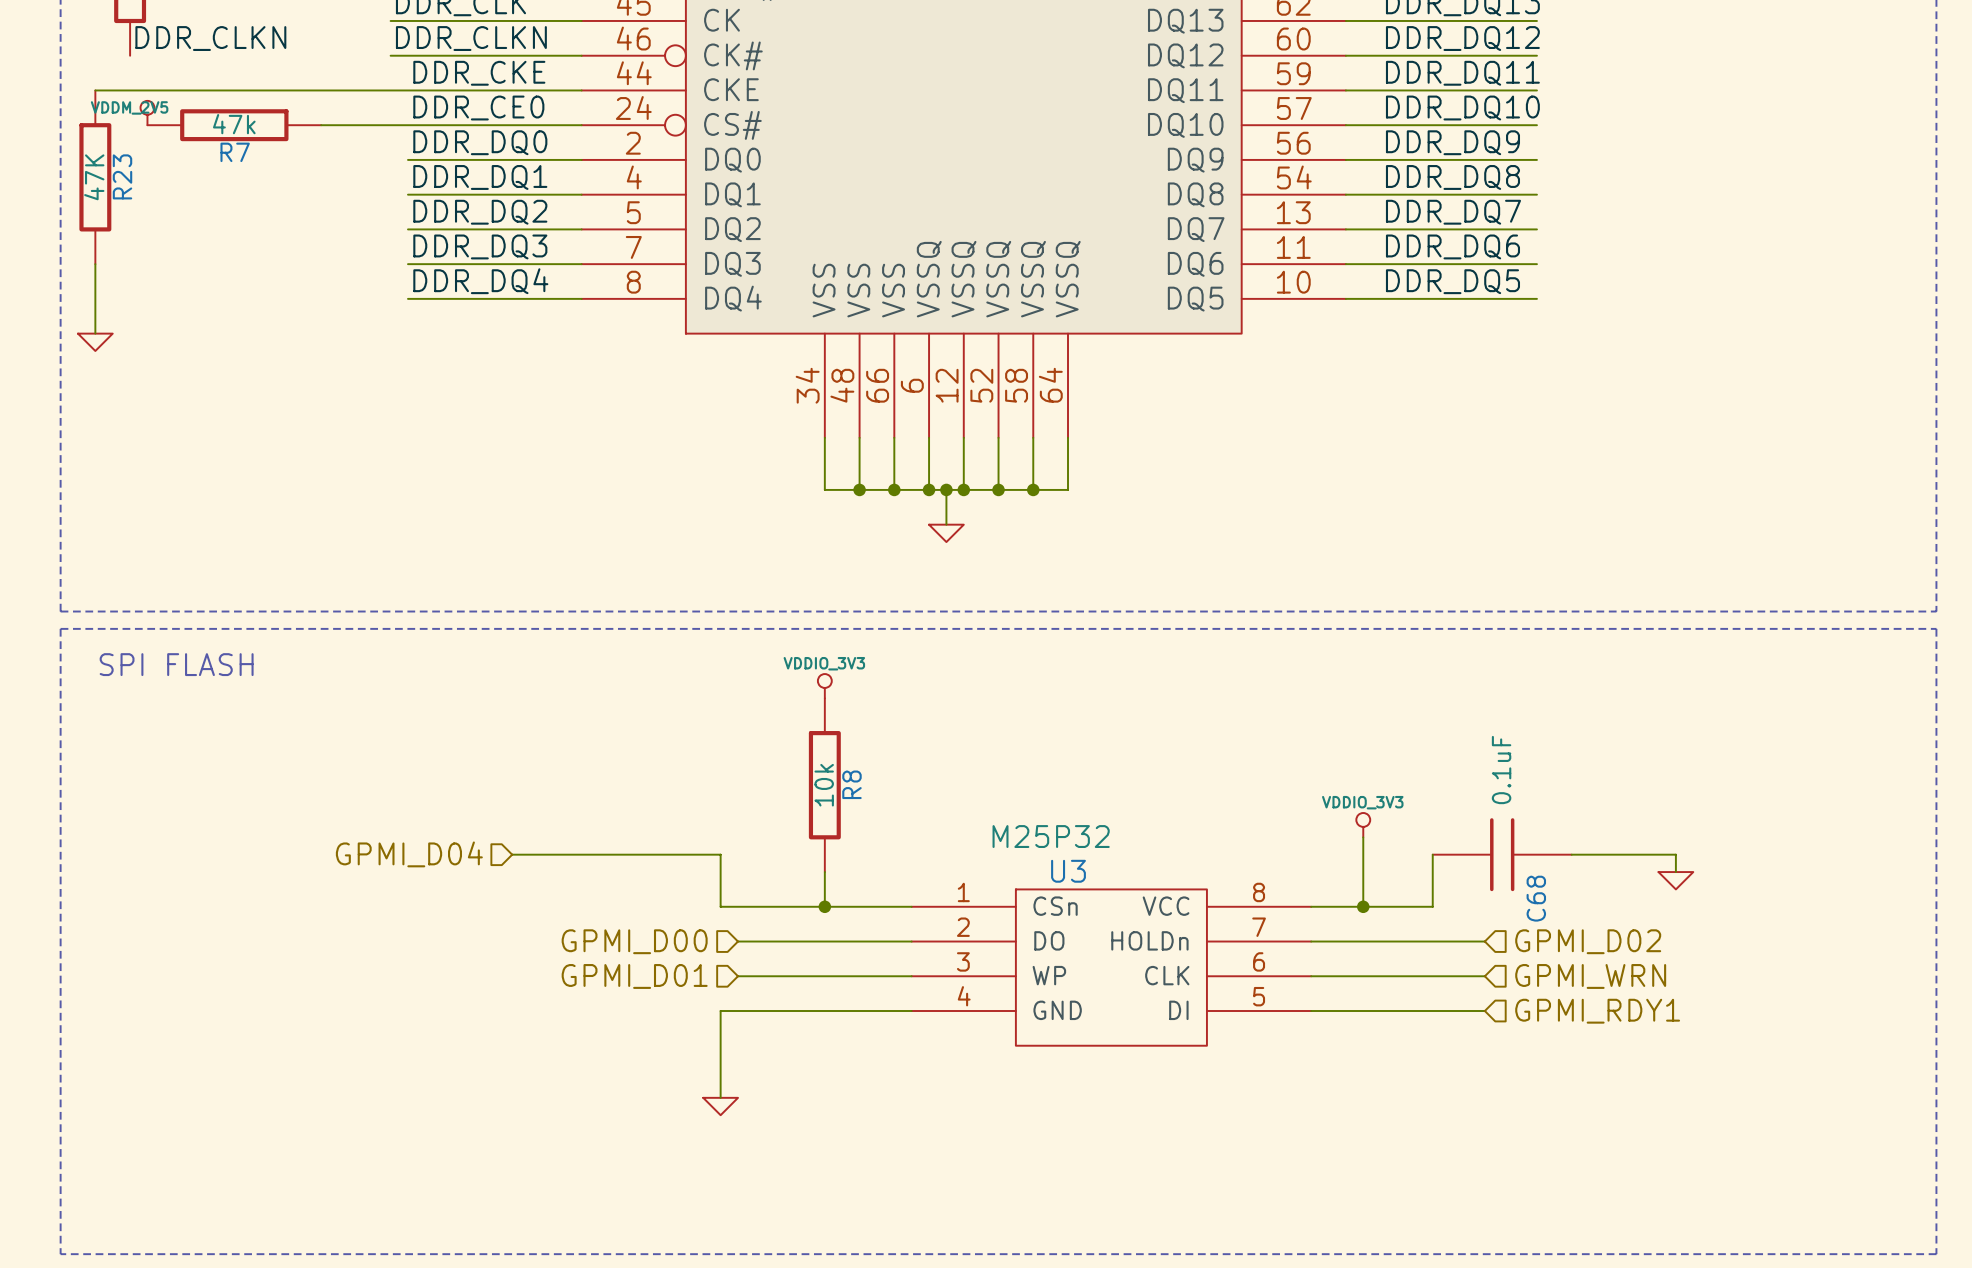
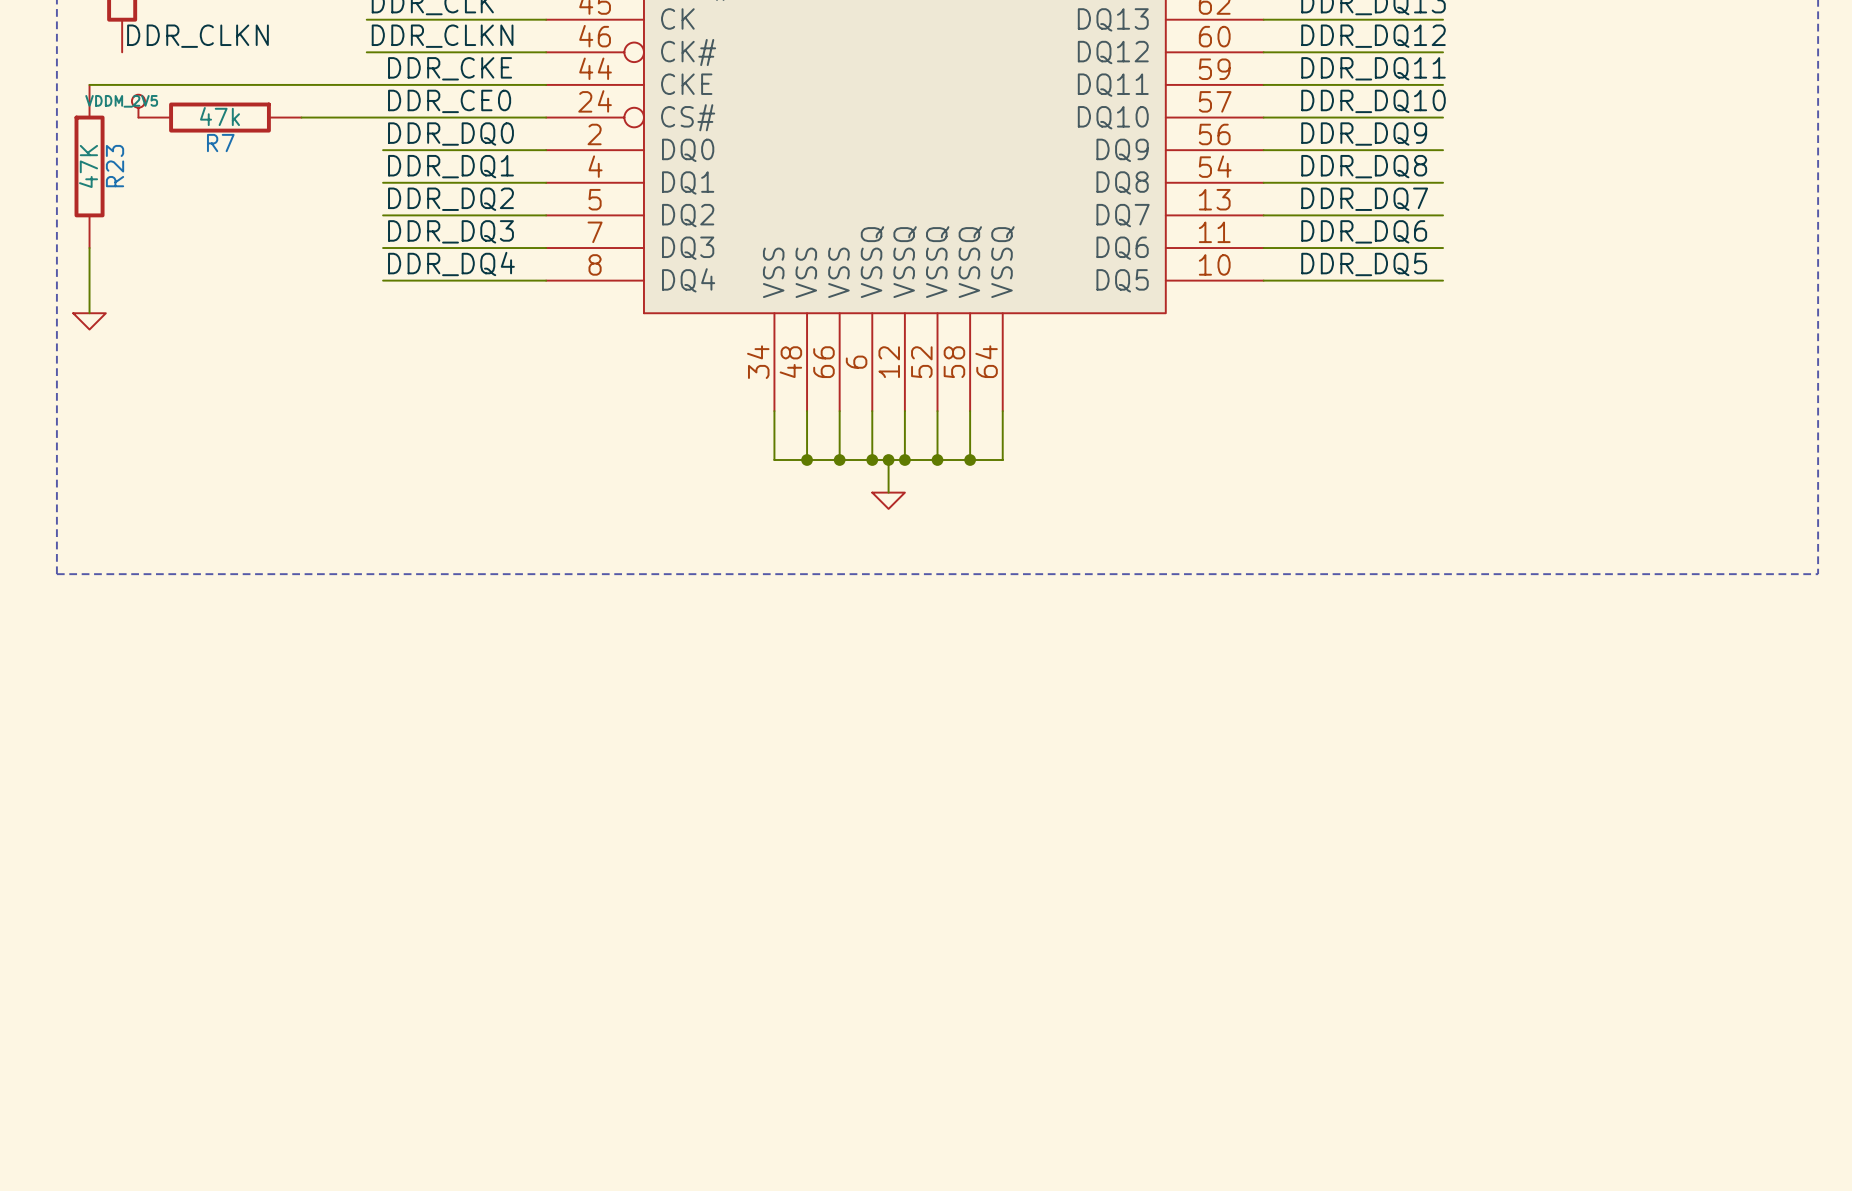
line: (60, 628) (60, 1254) (1936, 1254) (1936, 628) (60, 628) -> none
text: SPI FLASH (176, 664) -> none
power symbol: VDDIO_3V3 (824, 686) -> none
R8: 10k (824, 785) -> none
power symbol: VDDIO_3V3 (1363, 825) -> none
wire: (1363, 837) (1363, 906) -> none
hierarchical label: GPMI_D04 (409, 854) -> none
wire: (512, 854) (720, 854) (720, 906) (911, 906) -> none
wire: (1432, 854) (1432, 906) (1311, 906) -> none
C68: 0.1uF (1502, 854) -> none
wire: (1571, 854) (1675, 854) (1675, 872) -> none
wire: (824, 872) (824, 906) -> none
power symbol: (1675, 880) -> none
junction: (824, 906) -> none
junction: (1363, 906) -> none
hierarchical label: GPMI_D00 (634, 941) -> none
wire: (738, 941) (911, 941) -> none
wire: (1311, 941) (1484, 941) -> none
hierarchical label: GPMI_D02 (1588, 941) -> none
U3: M25P32 (1111, 967) -> none
hierarchical label: GPMI_D01 (634, 976) -> none
wire: (738, 976) (911, 976) -> none
wire: (1311, 976) (1484, 976) -> none
hierarchical label: GPMI_WRN (1590, 976) -> none
wire: (911, 1011) (720, 1011) (720, 1097) -> none
wire: (1311, 1011) (1484, 1011) -> none
hierarchical label: GPMI_RDY1 (1597, 1011) -> none
power symbol: (720, 1106) -> none

